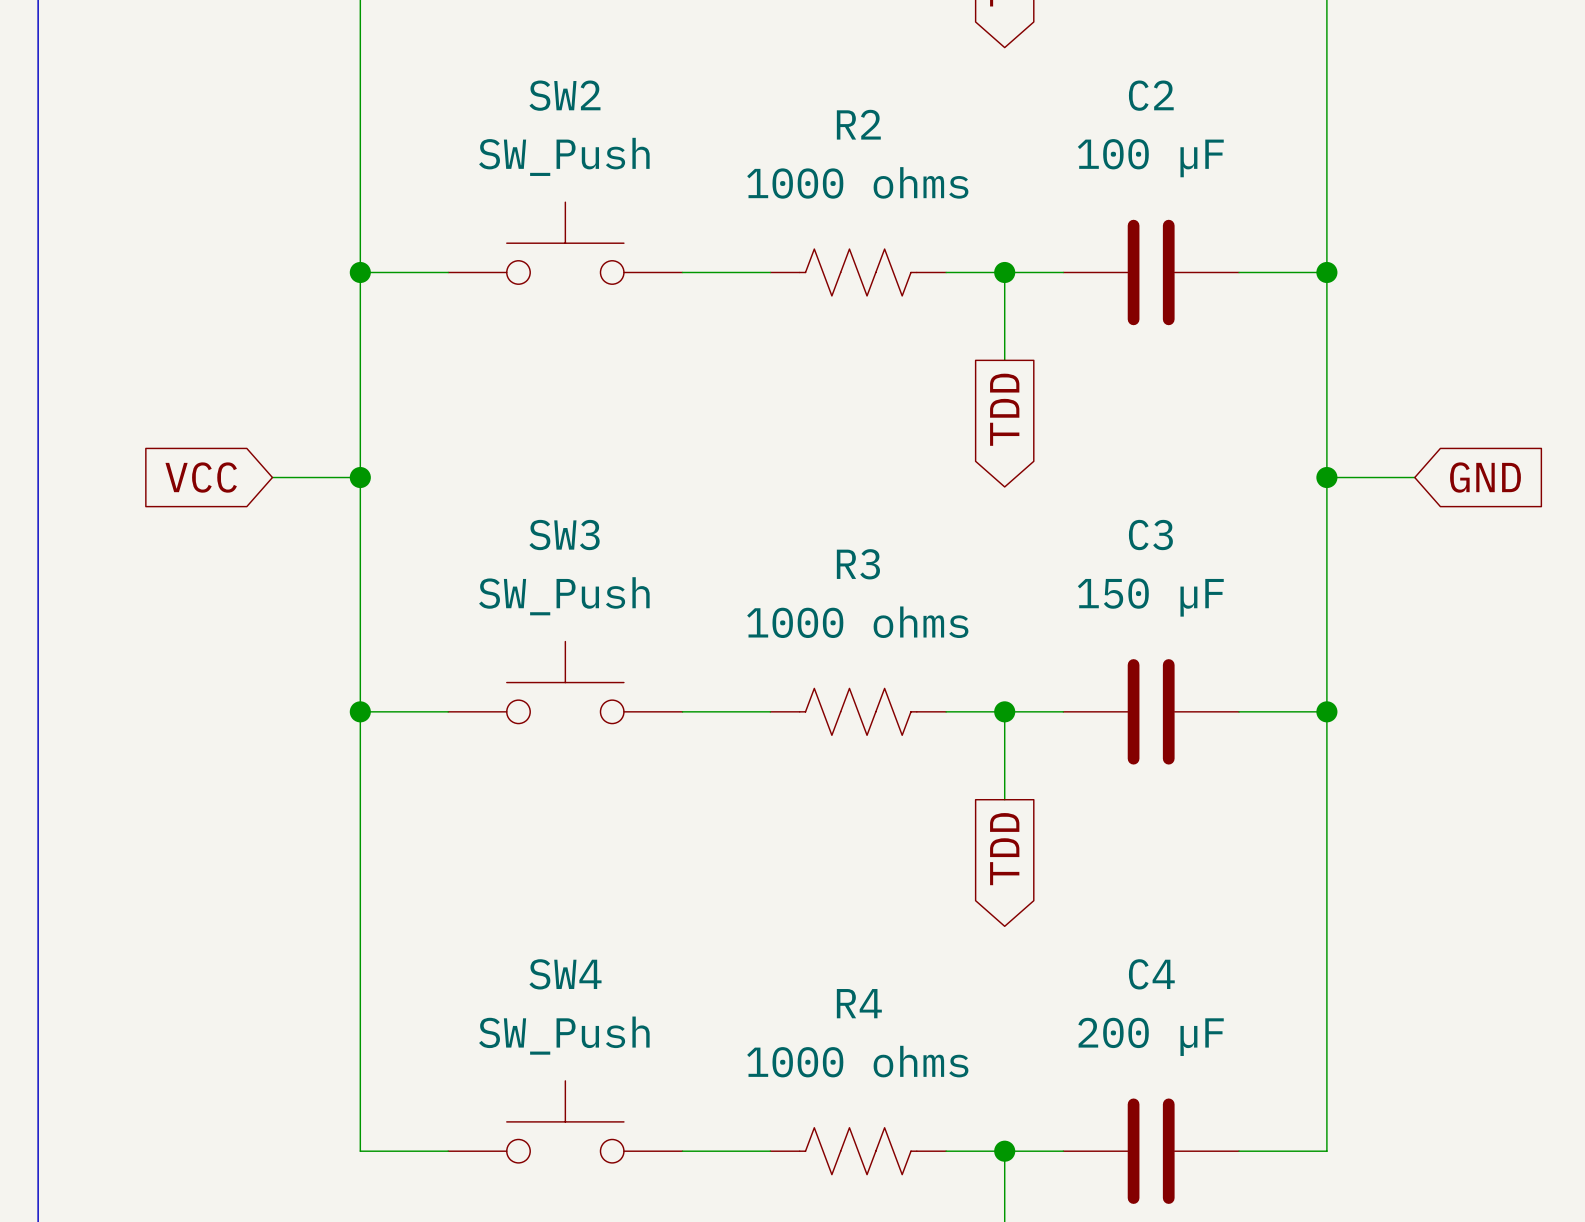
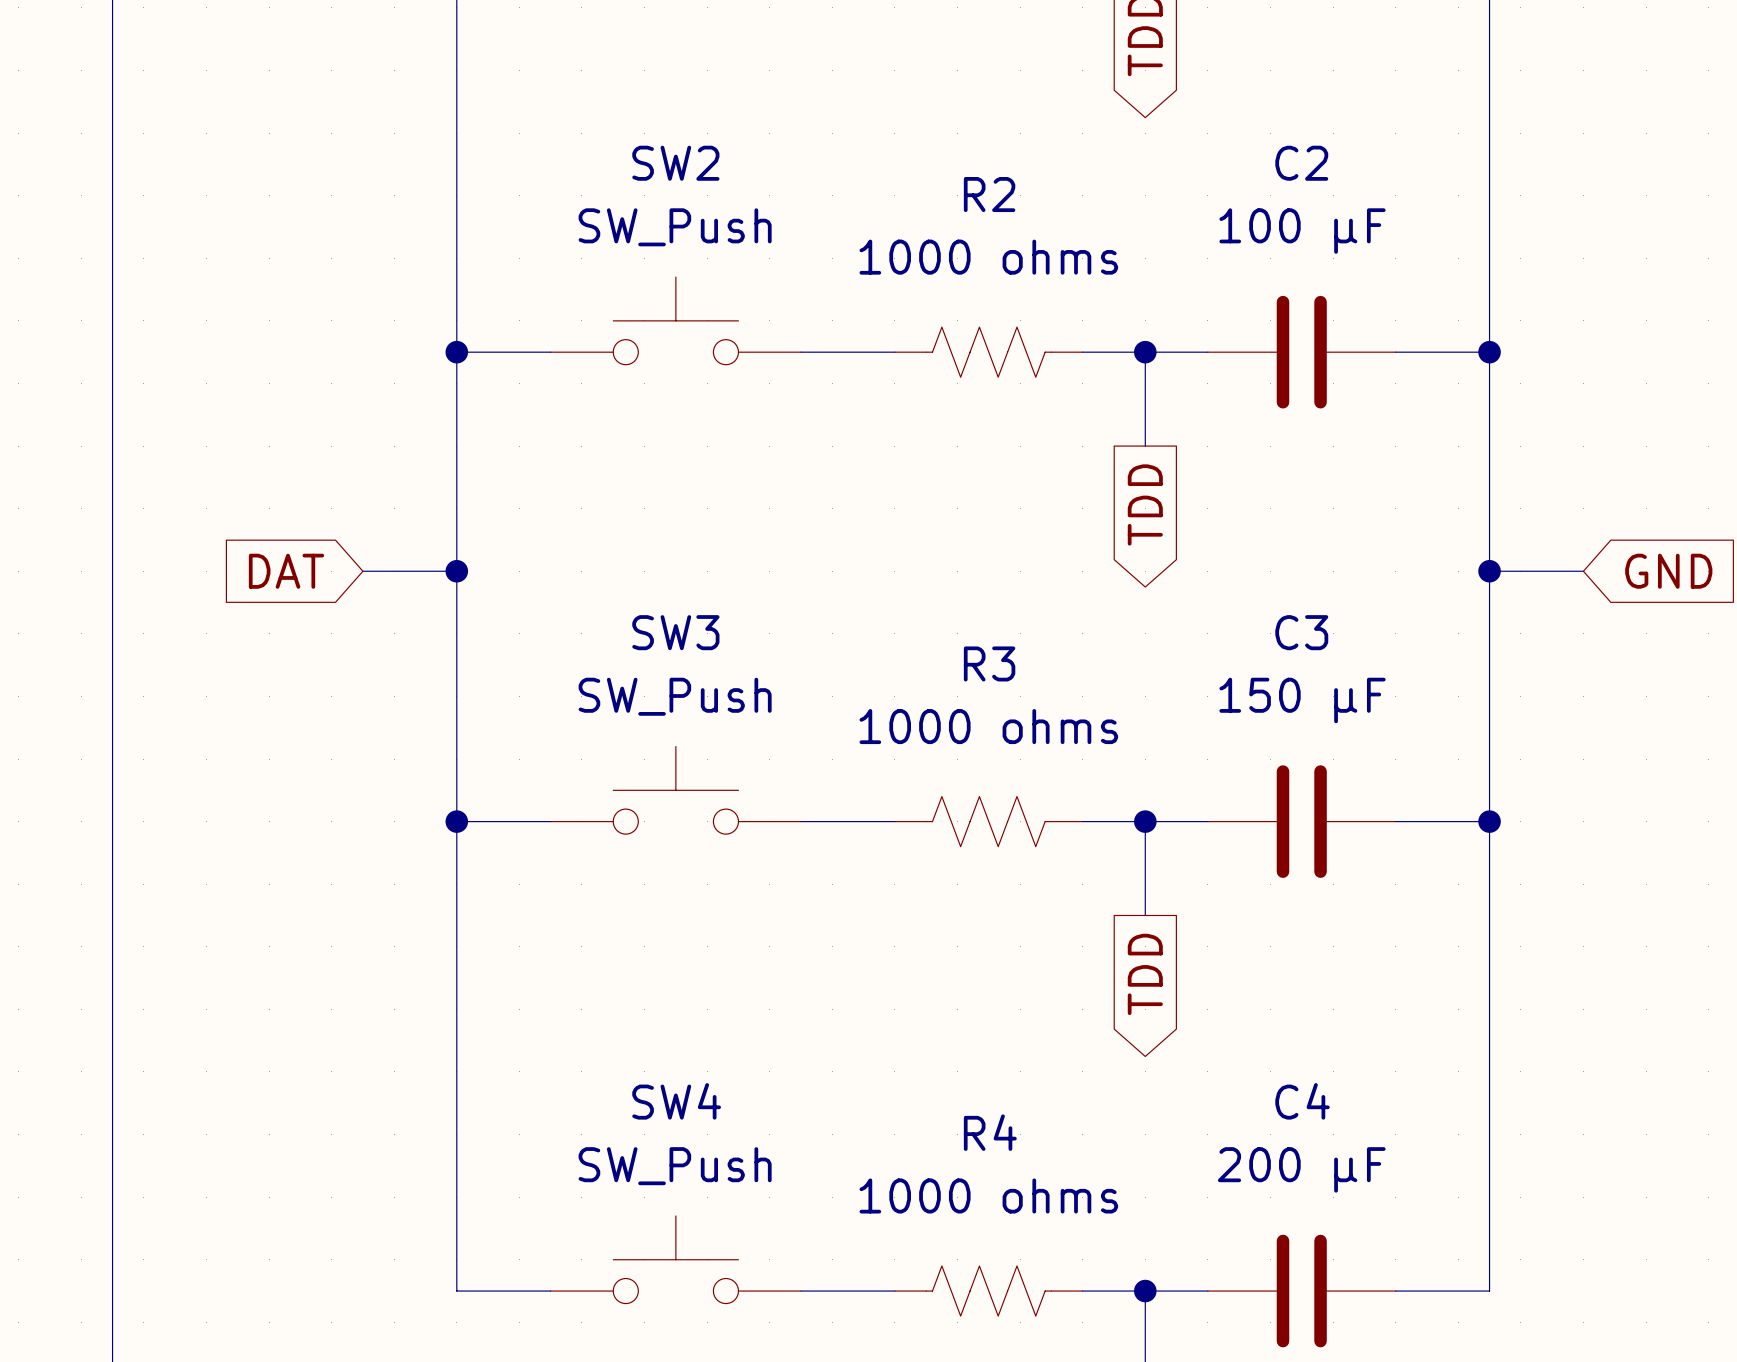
global label: VCC (201, 477) -> DAT (286, 571)

